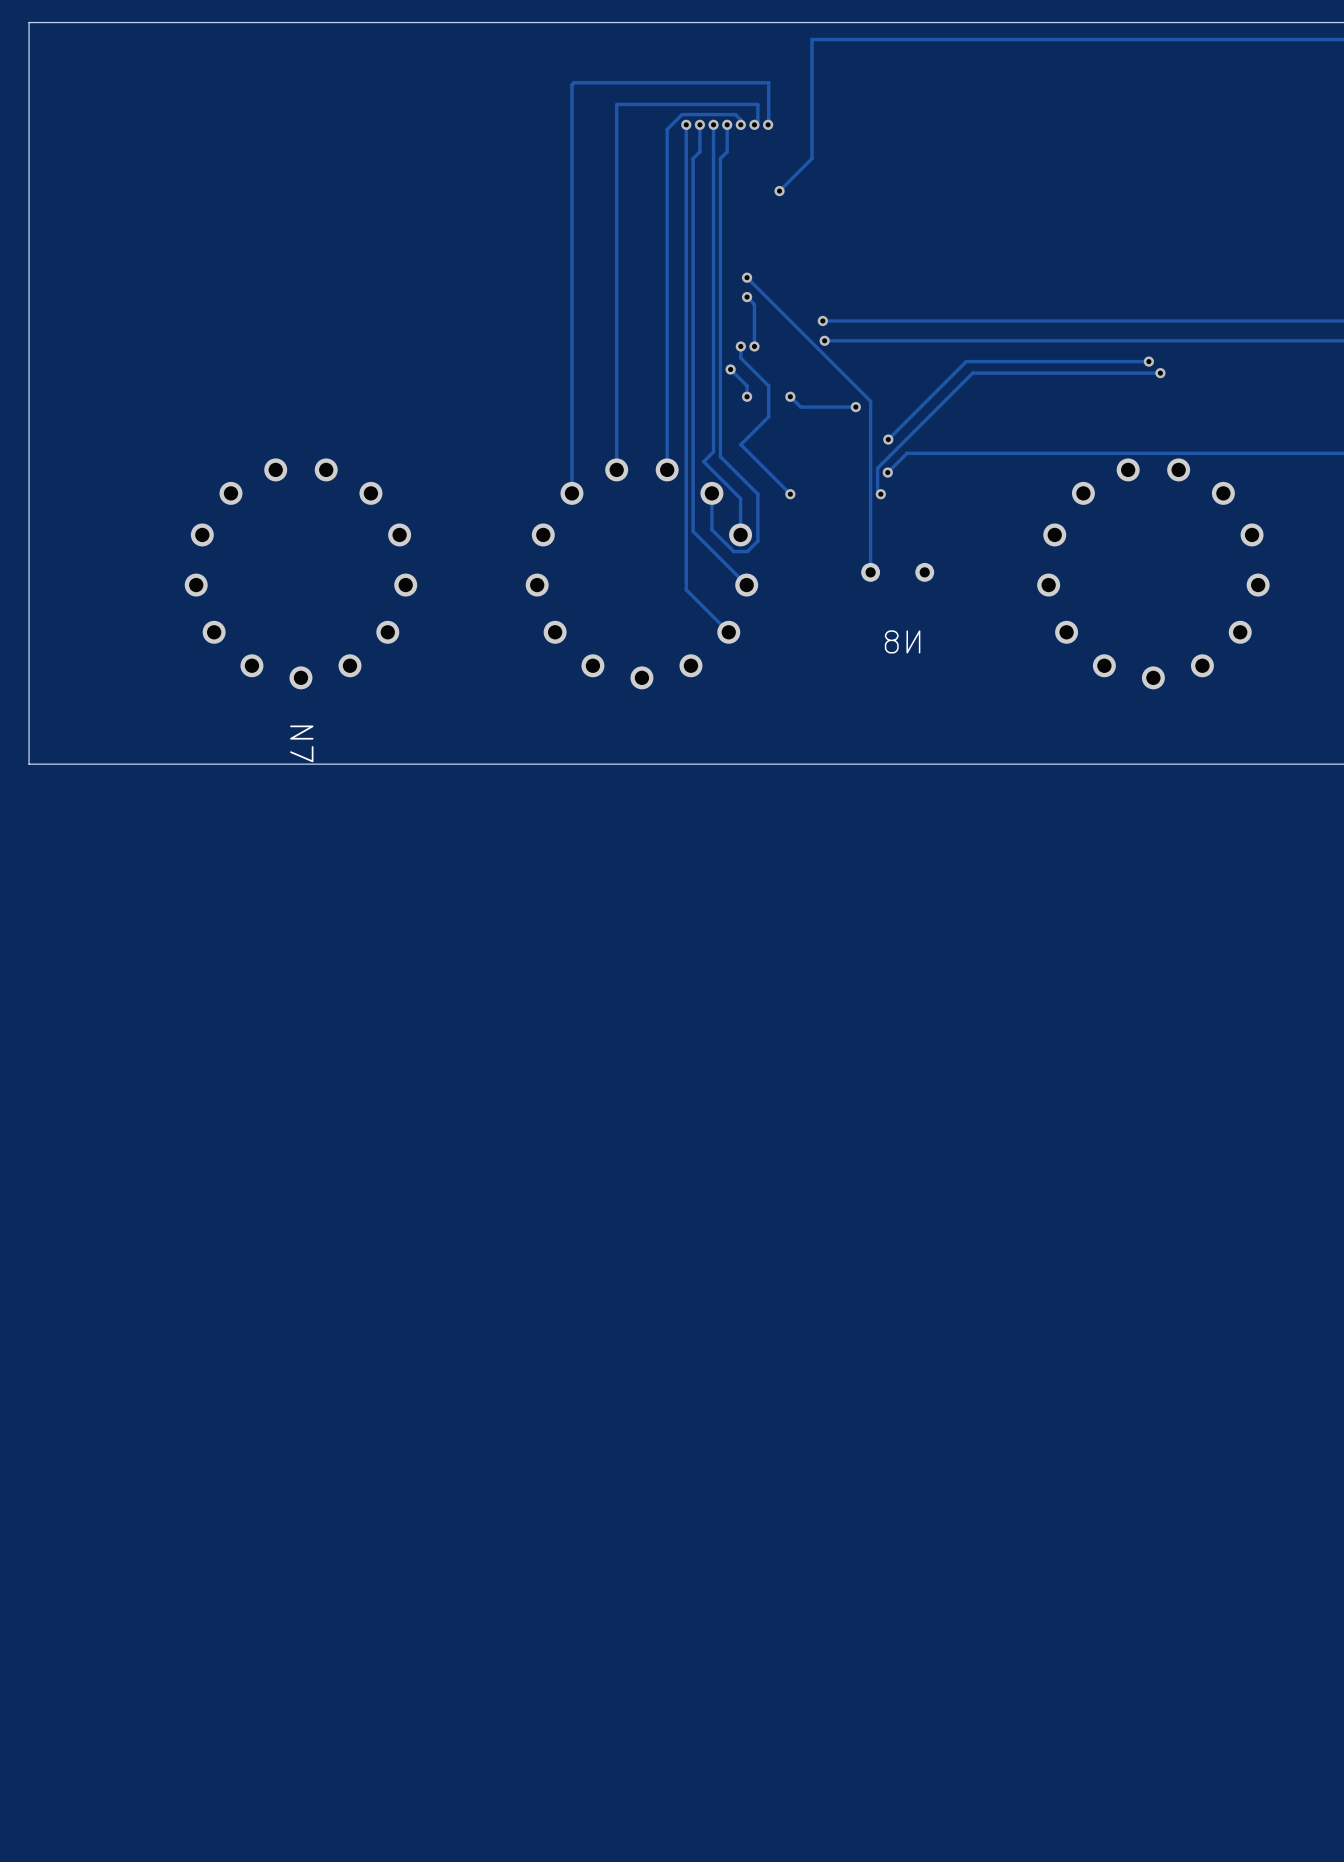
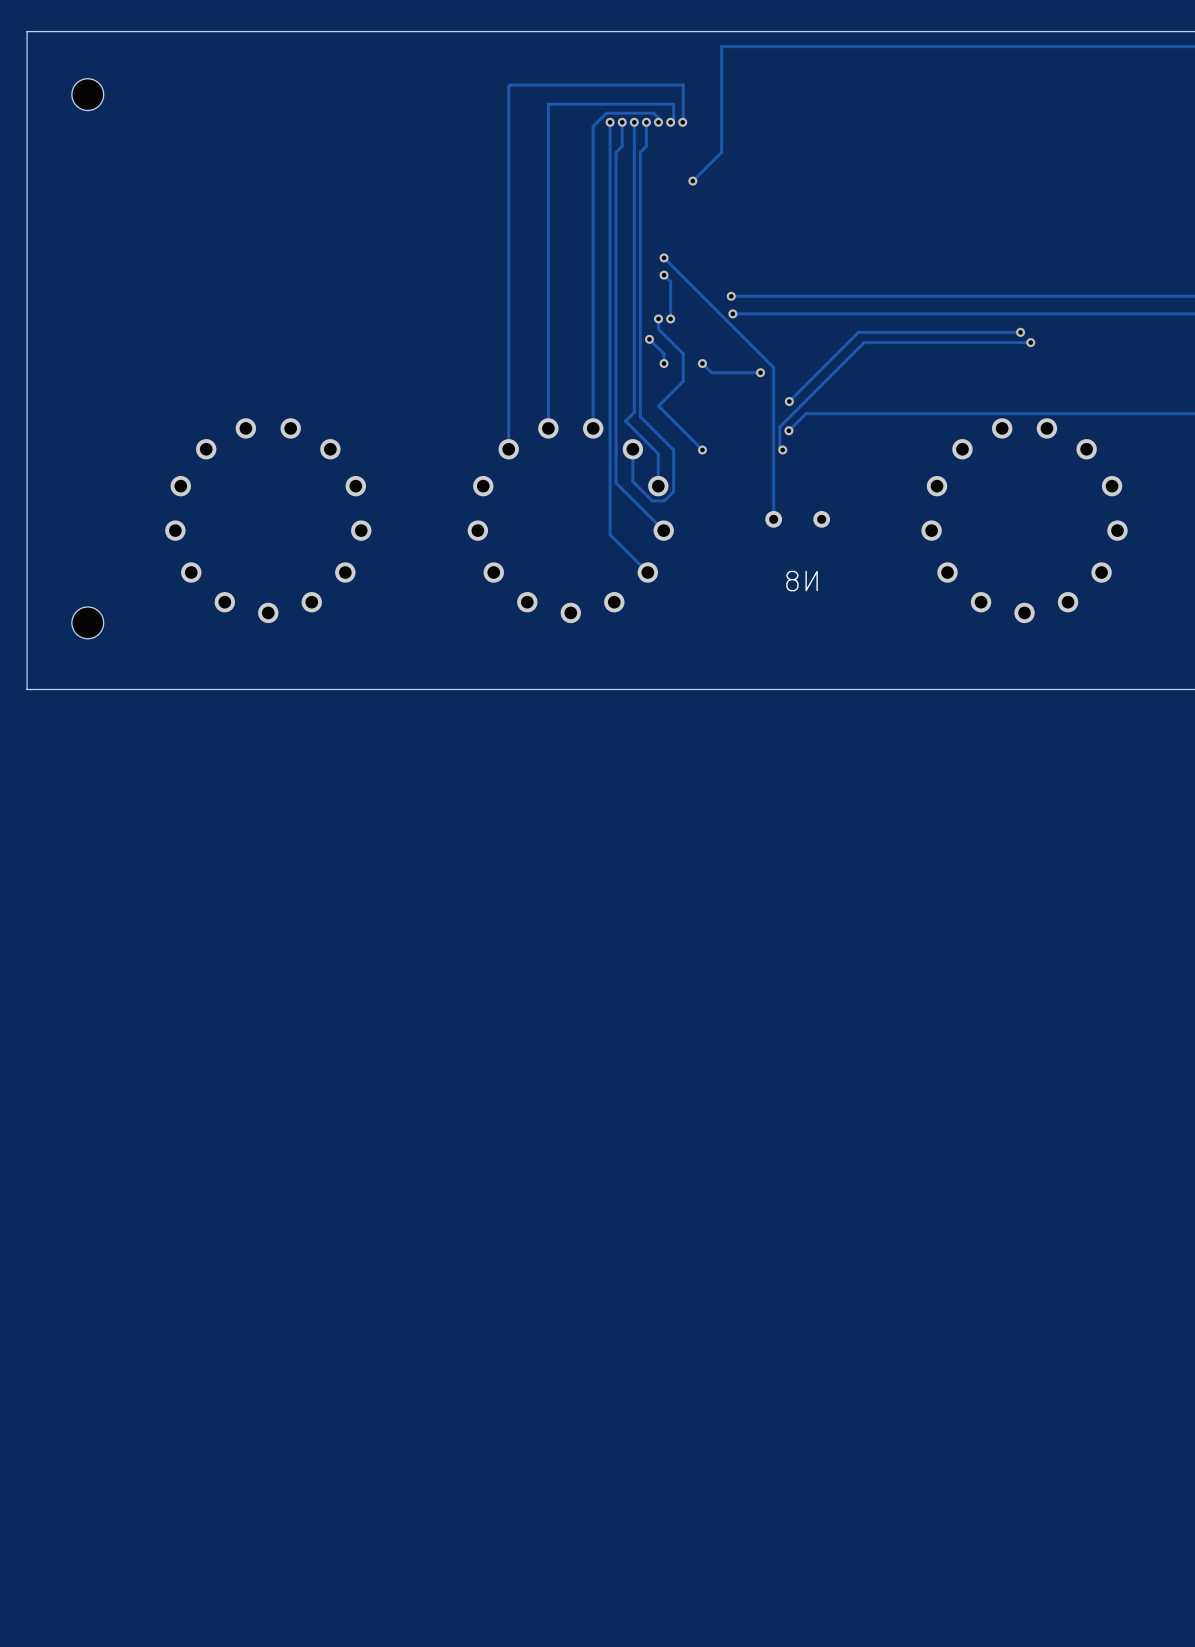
part: none -> (87, 94)
part: none -> (87, 622)
N7 name: N7 (301, 743) -> none

